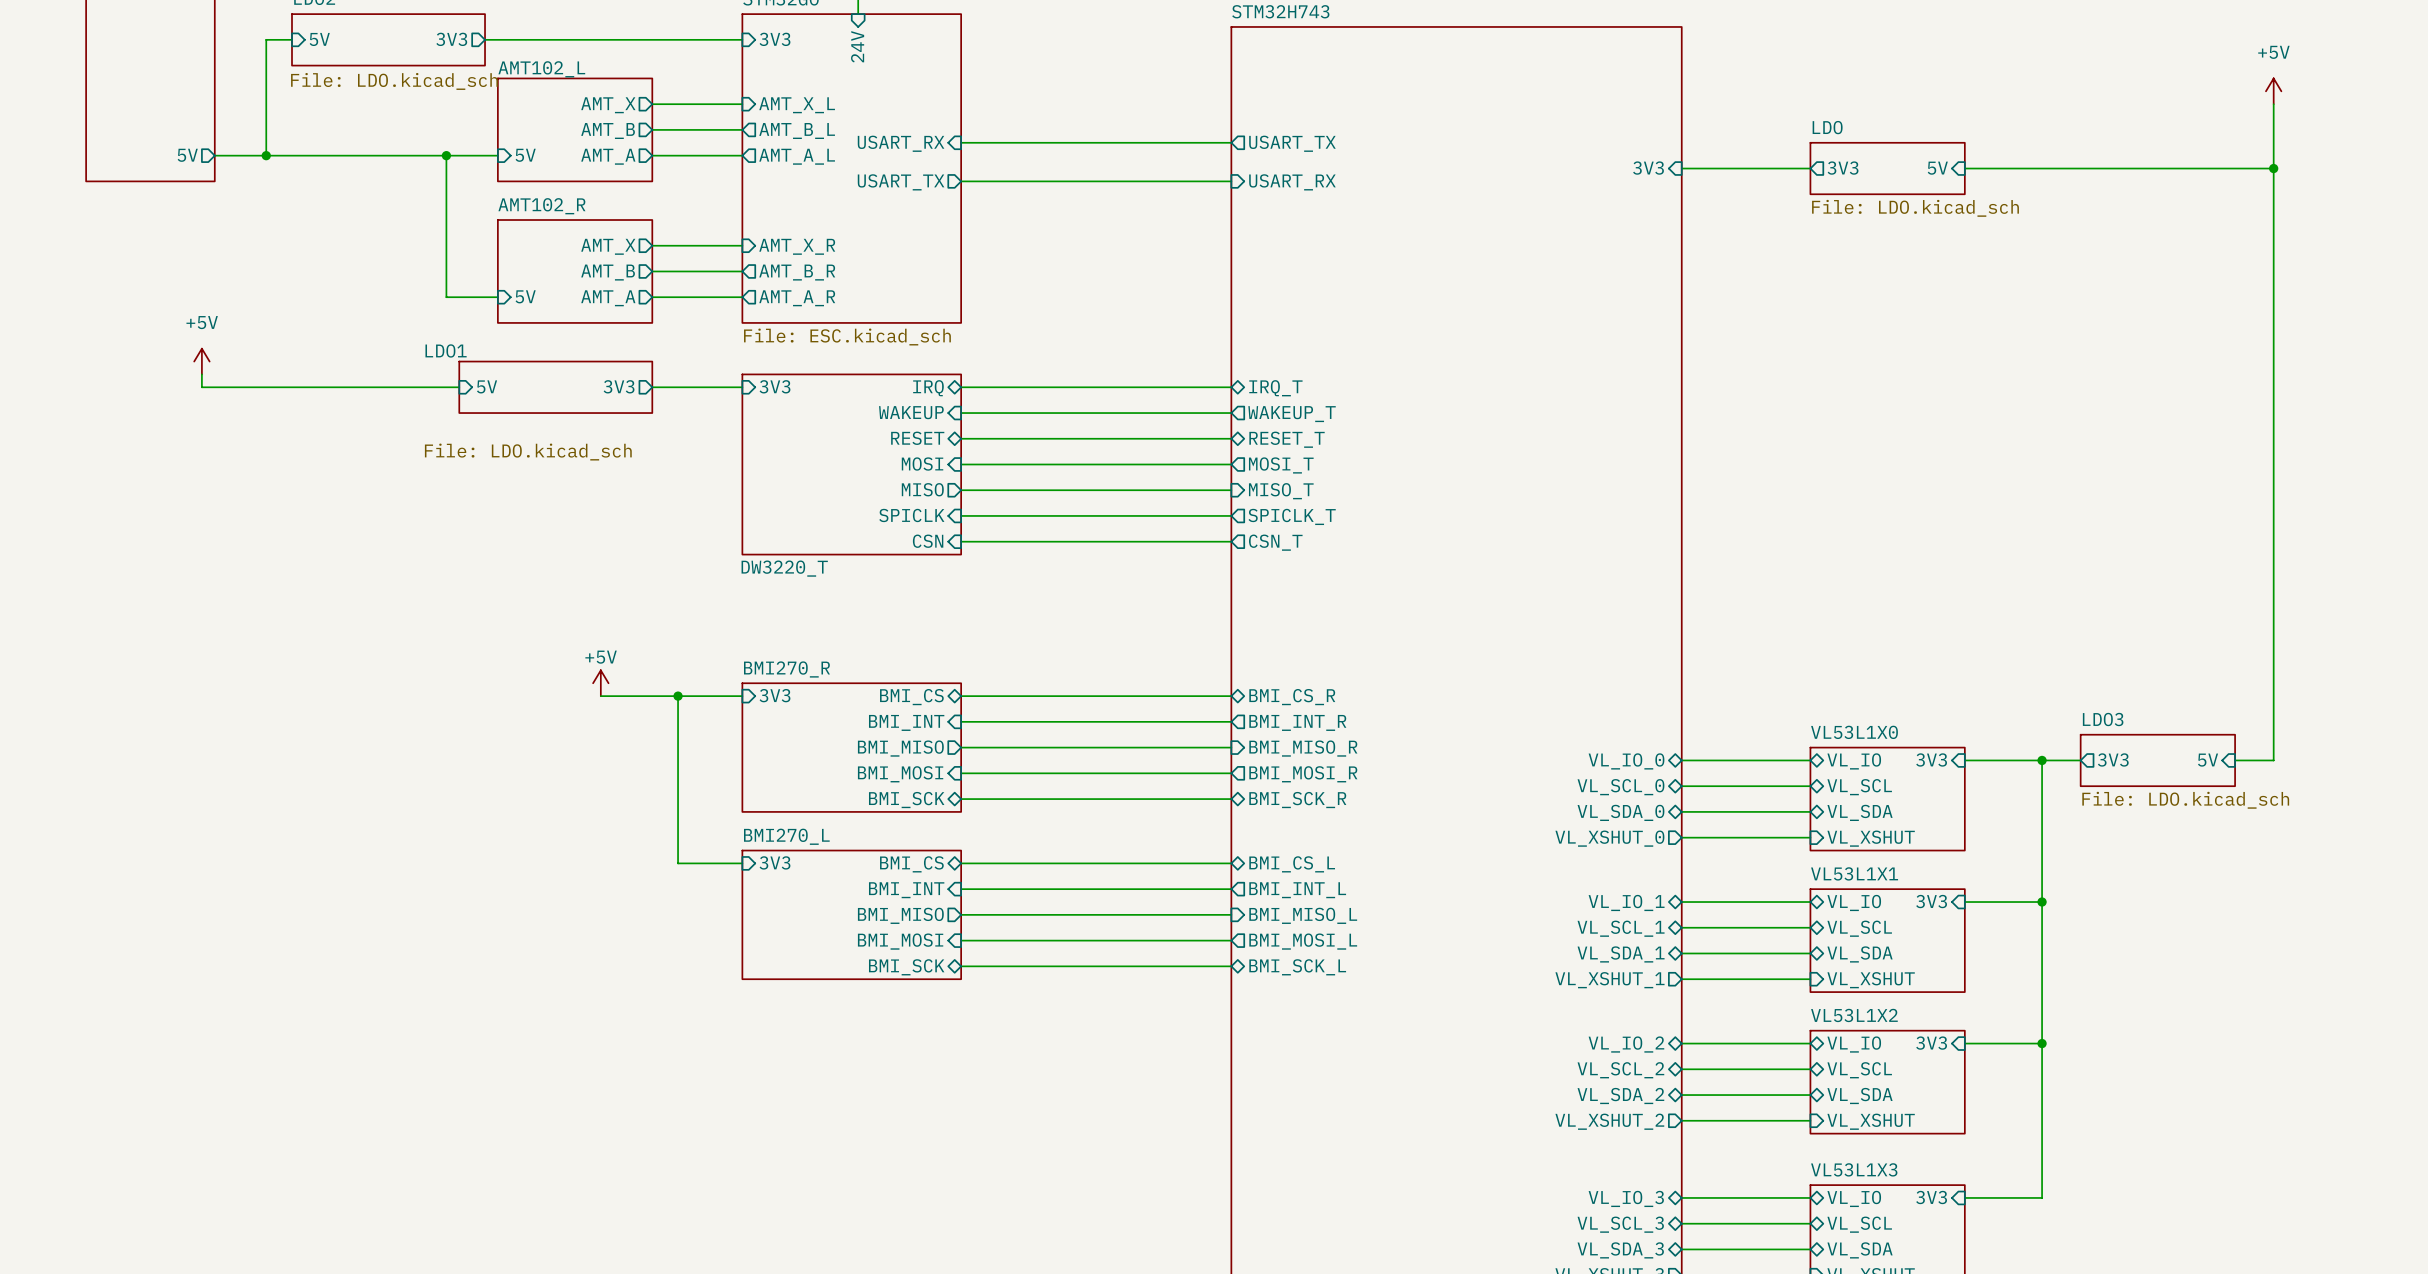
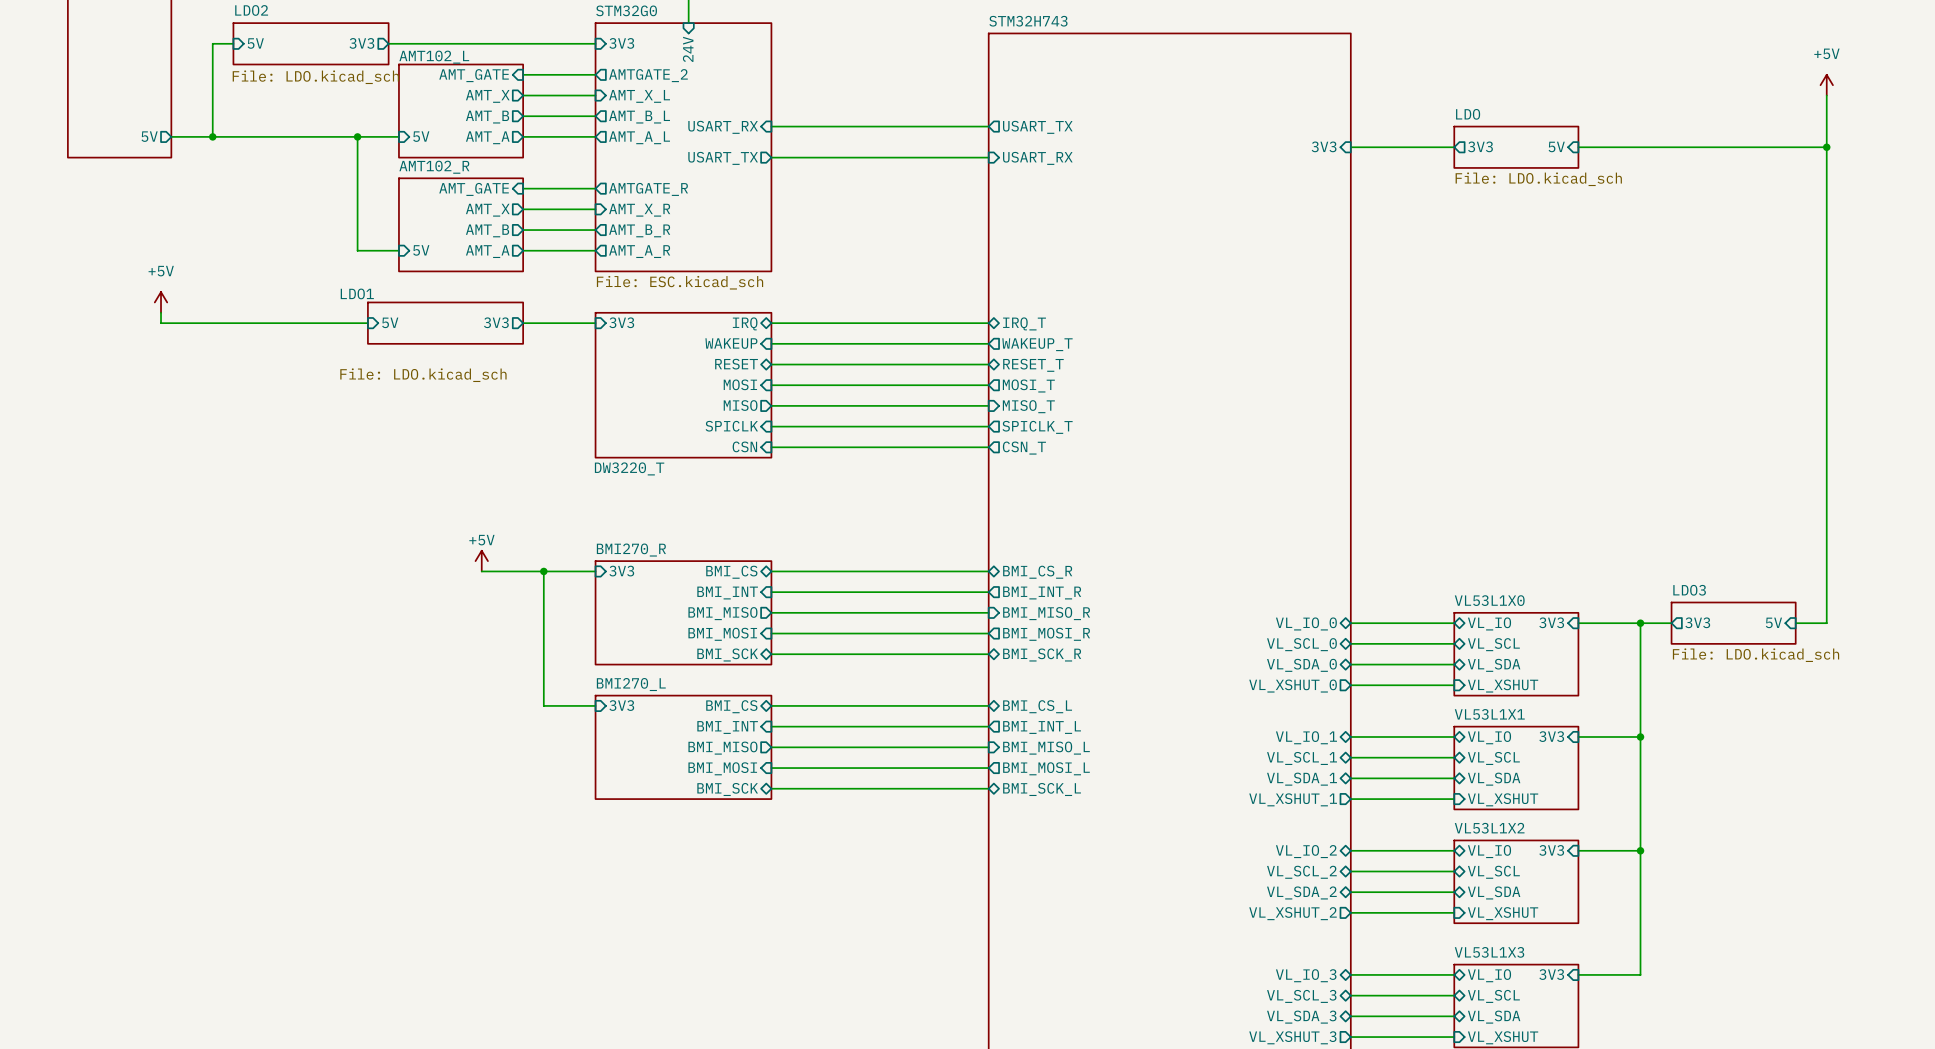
sheet AMT102_L shape: [497, 77, 654, 183] -> [398, 63, 524, 159]
wire: none -> (523, 74) (595, 74)
sheet pin: none -> AMT_GATE (474, 75)
sheet pin: none -> AMTGATE_2 (648, 75)
sheet AMT102_R shape: [497, 219, 654, 324] -> [398, 177, 524, 273]
sheet pin: none -> AMT_GATE (474, 189)
wire: none -> (523, 188) (595, 188)
sheet pin: none -> AMTGATE_R (648, 189)

